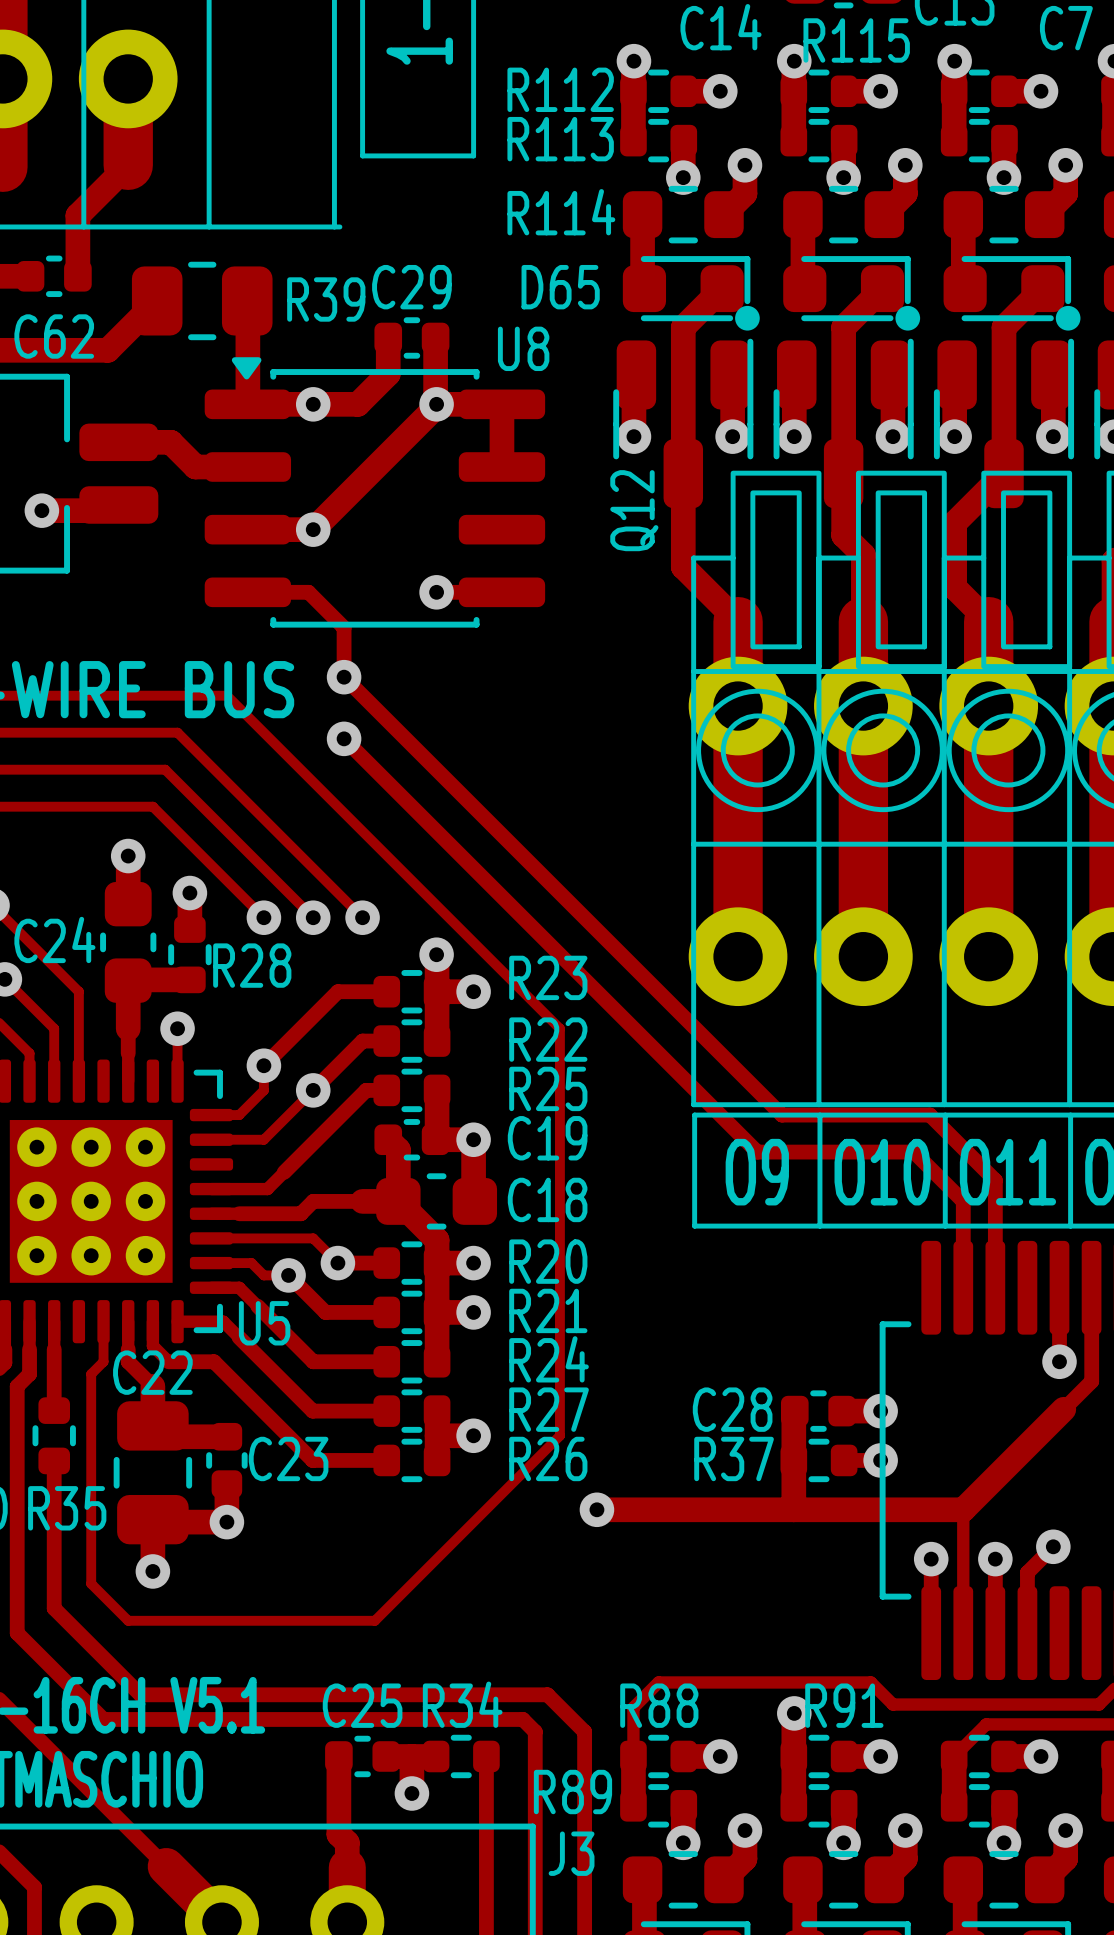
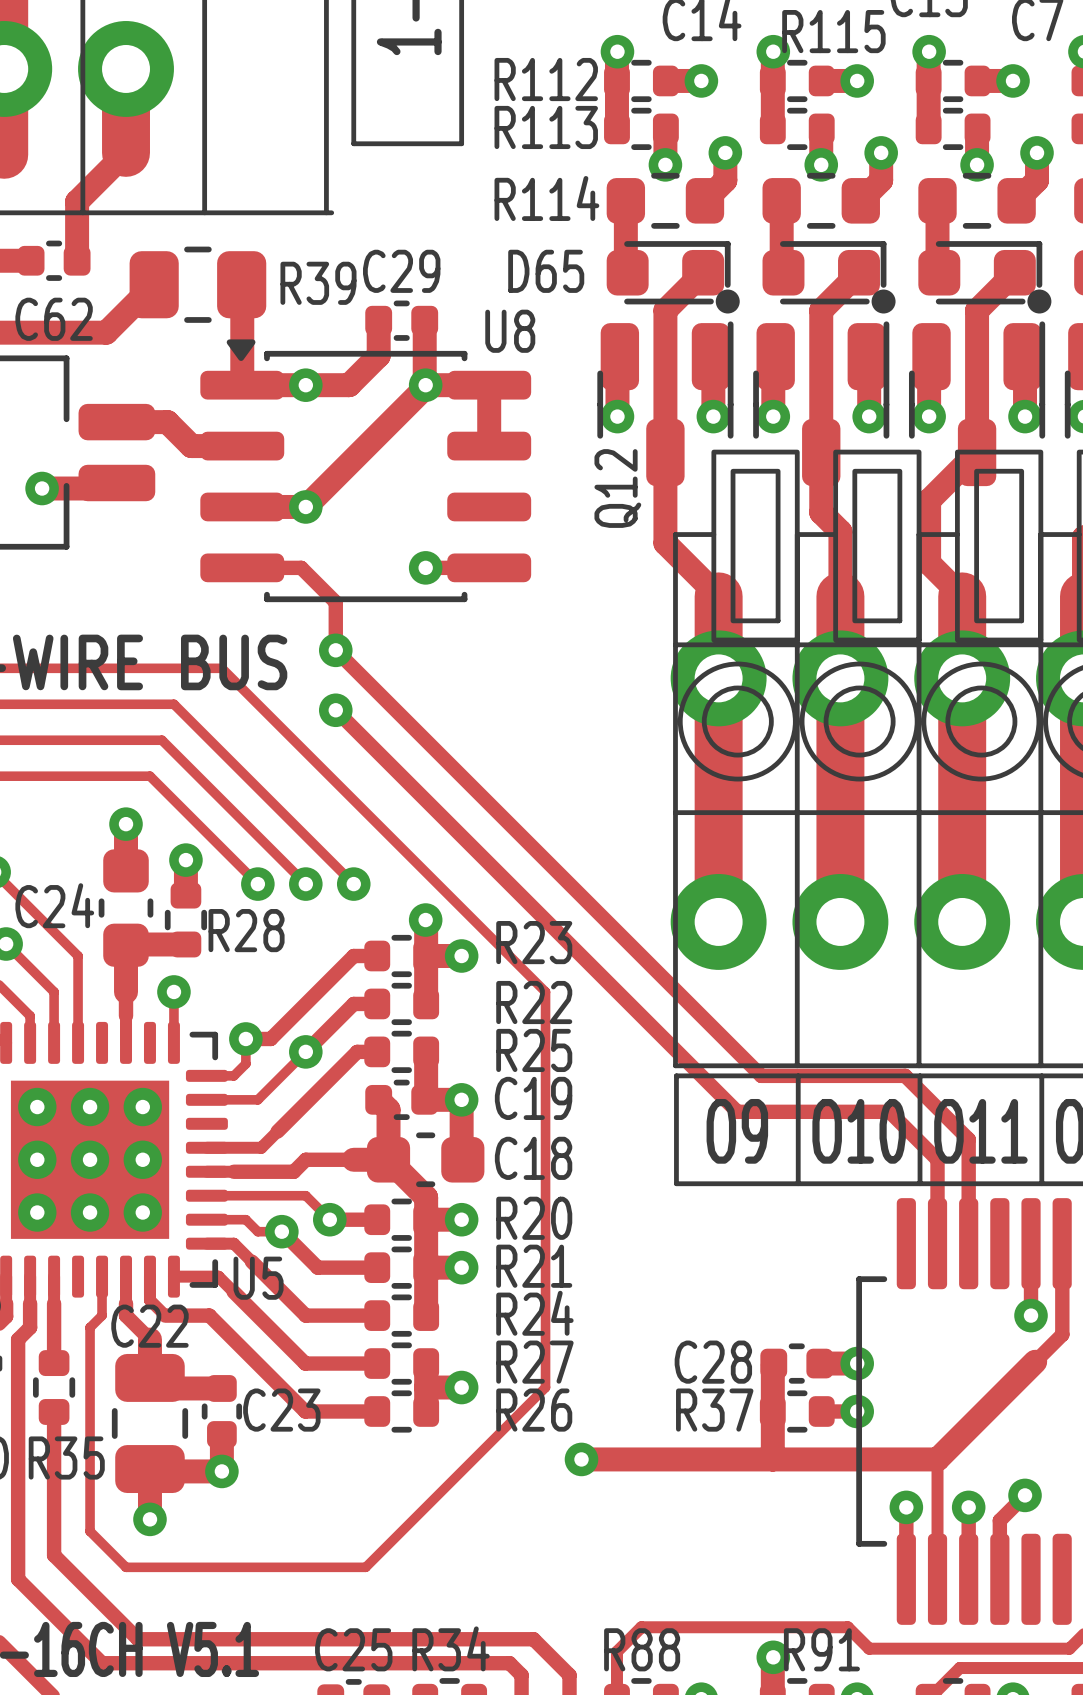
track: (362, 991) (337, 991) (263, 1065) (263, 1090) (251, 1102) -> (353, 955) (270, 1038) (245, 1038) (245, 1063)
via position: (263, 1065) -> (245, 1038)

